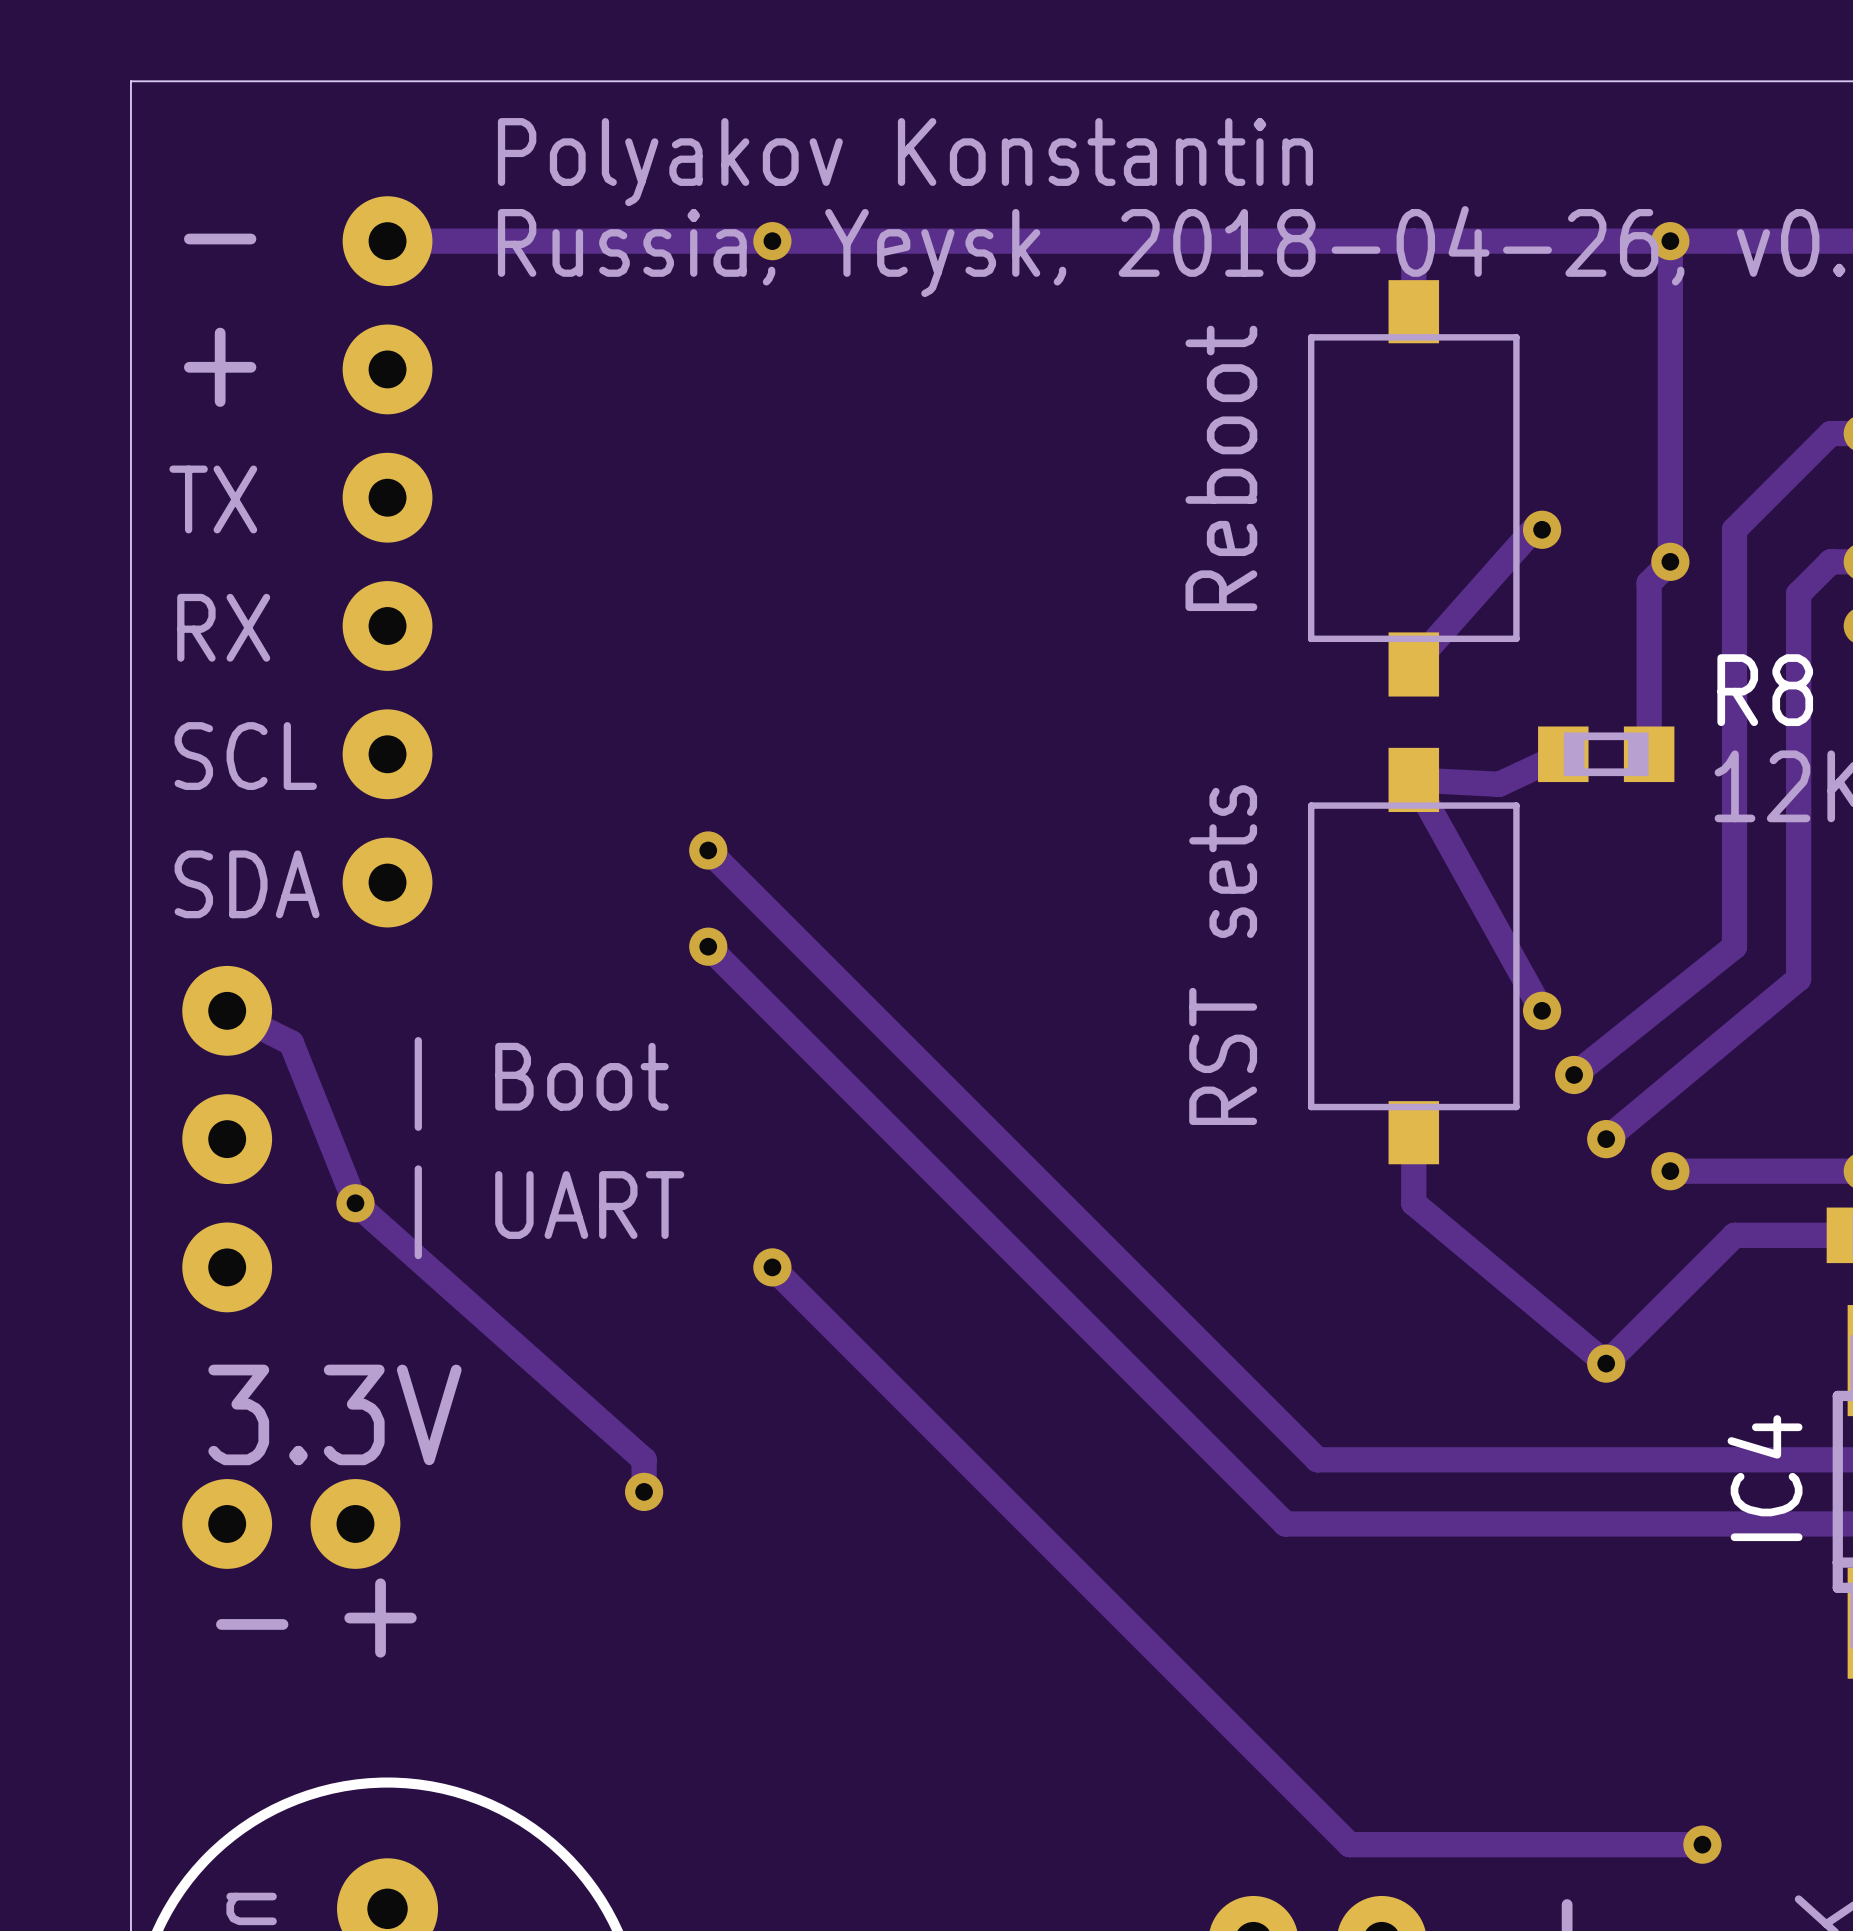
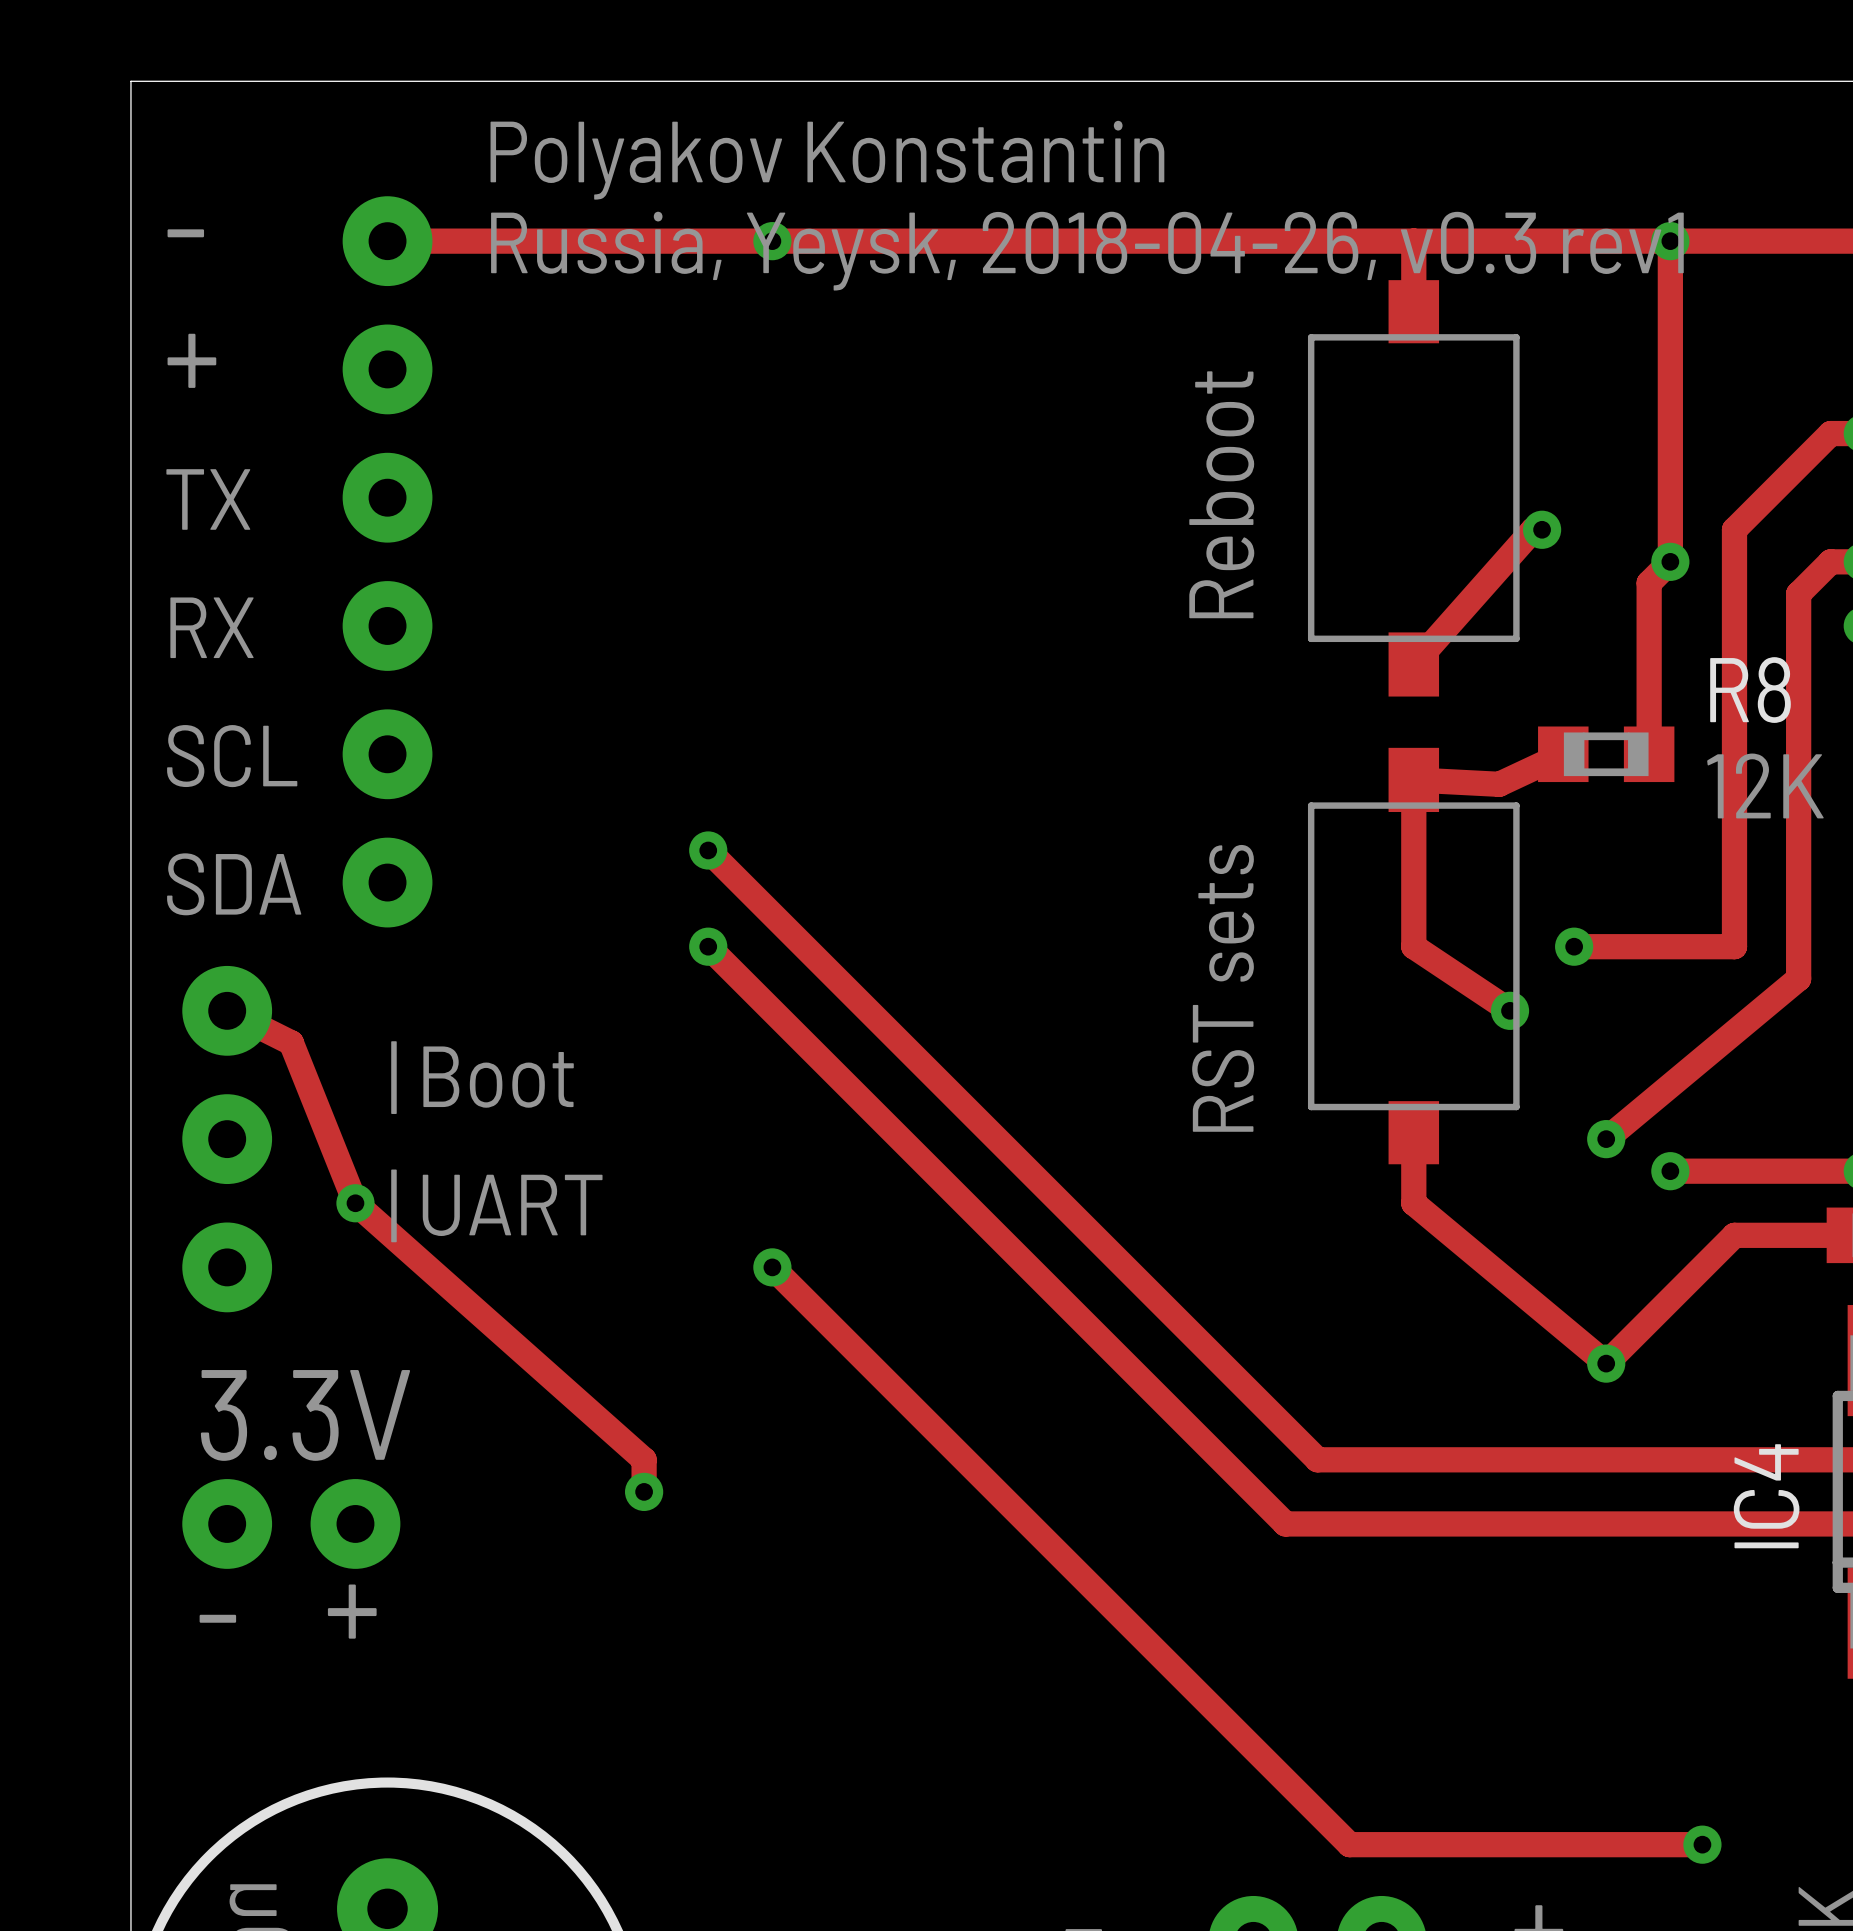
track: (1413, 779) (1542, 1010) -> (1413, 779) (1413, 946) (1510, 1010)
via: none -> (1574, 946)
track: (1734, 946) (1574, 1074) -> (1734, 946) (1574, 946)
via position: (1542, 1010) -> (1510, 1010)
via: (1574, 1074) -> none

